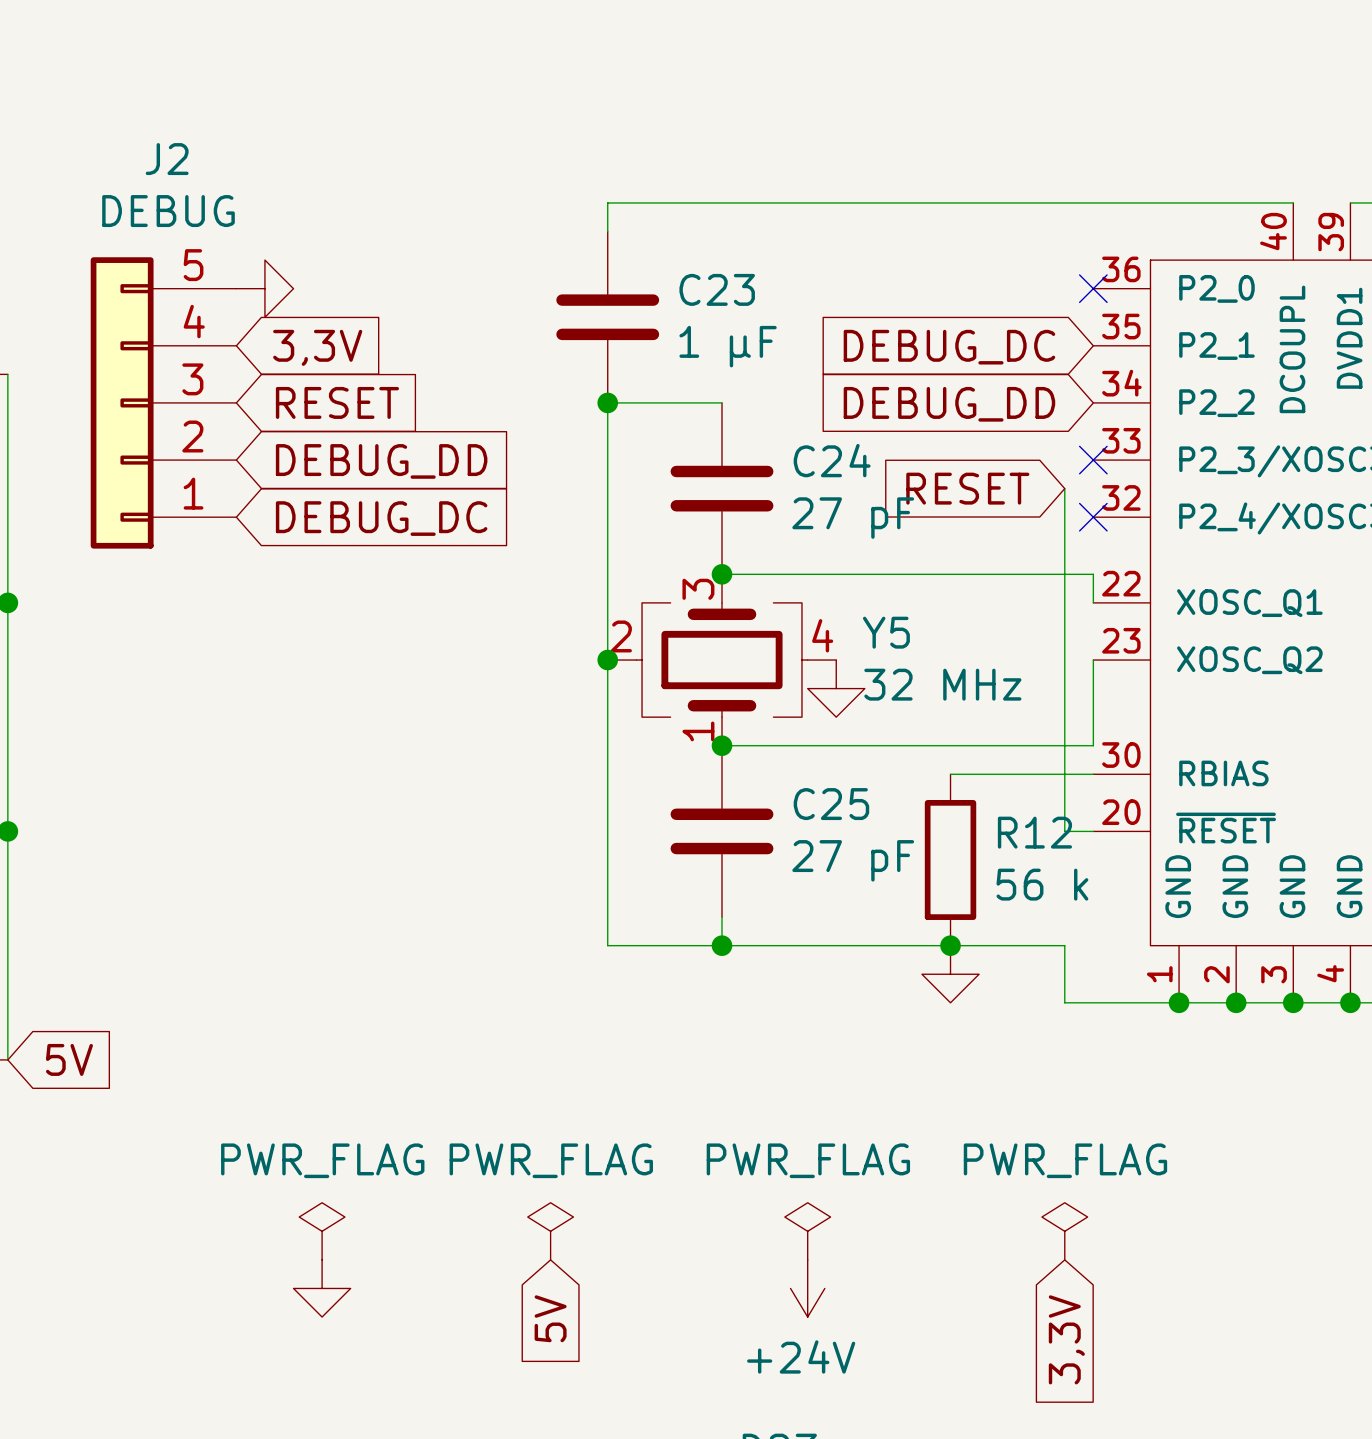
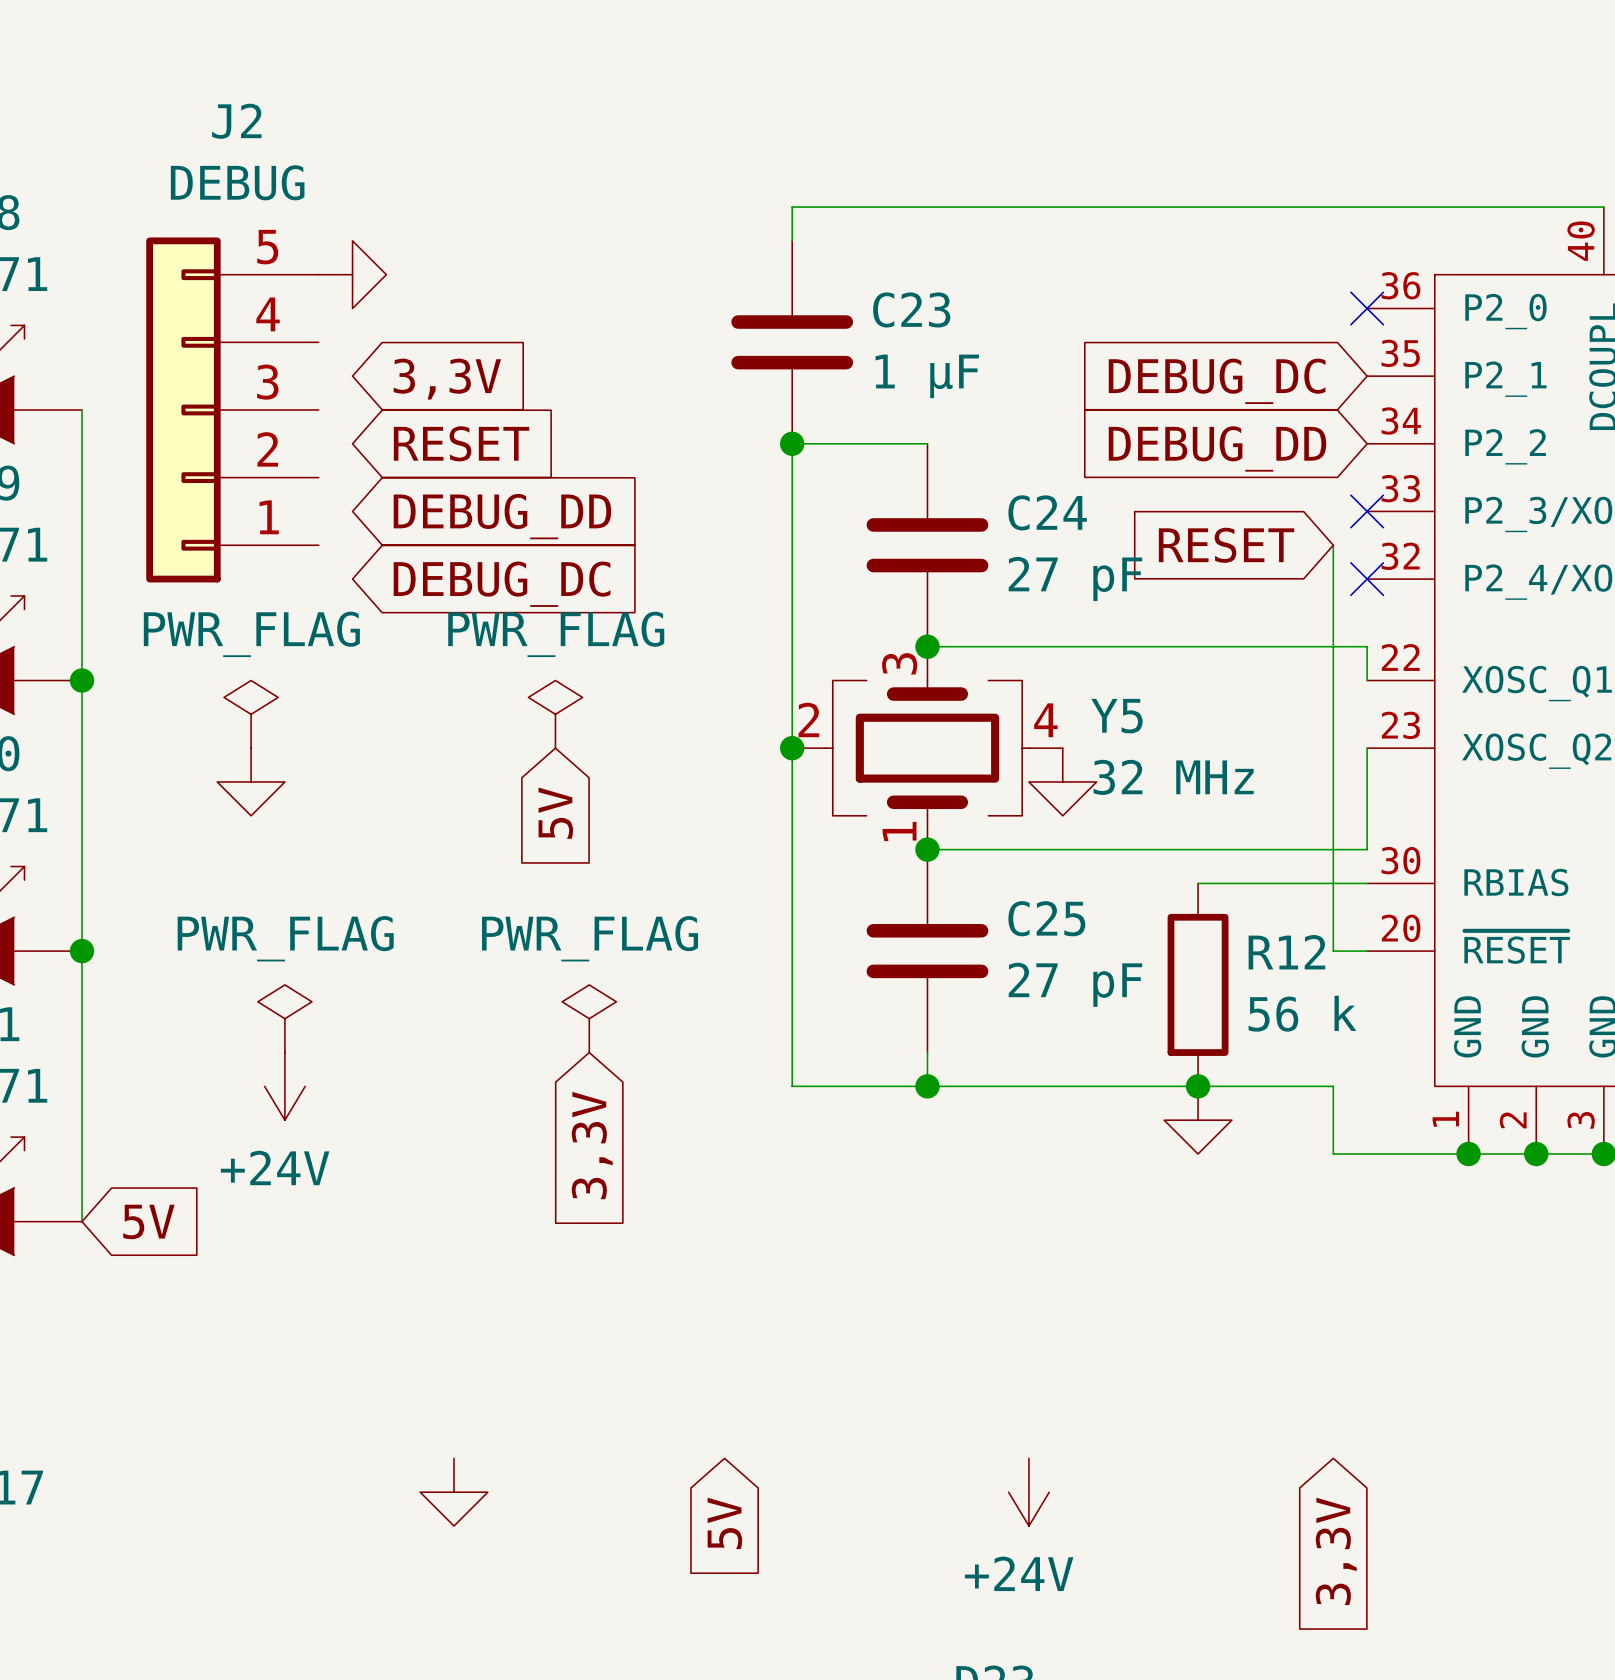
power symbol position: (264, 288) -> (352, 274)
J2 position: (163, 402) -> (232, 409)
power symbol: none -> PWR_FLAG (251, 714)
power symbol: none -> PWR_FLAG (555, 714)
power symbol: none -> (251, 781)
global label: none -> 5V (555, 813)
power symbol: none -> PWR_FLAG (284, 1018)
power symbol: none -> PWR_FLAG (589, 1018)
power symbol: none -> +24V (284, 1086)
global label: none -> 3,3V (592, 1145)
power symbol: PWR_FLAG (322, 1231) -> none
power symbol: PWR_FLAG (550, 1231) -> none
power symbol: PWR_FLAG (807, 1231) -> none
power symbol: PWR_FLAG (1064, 1231) -> none

